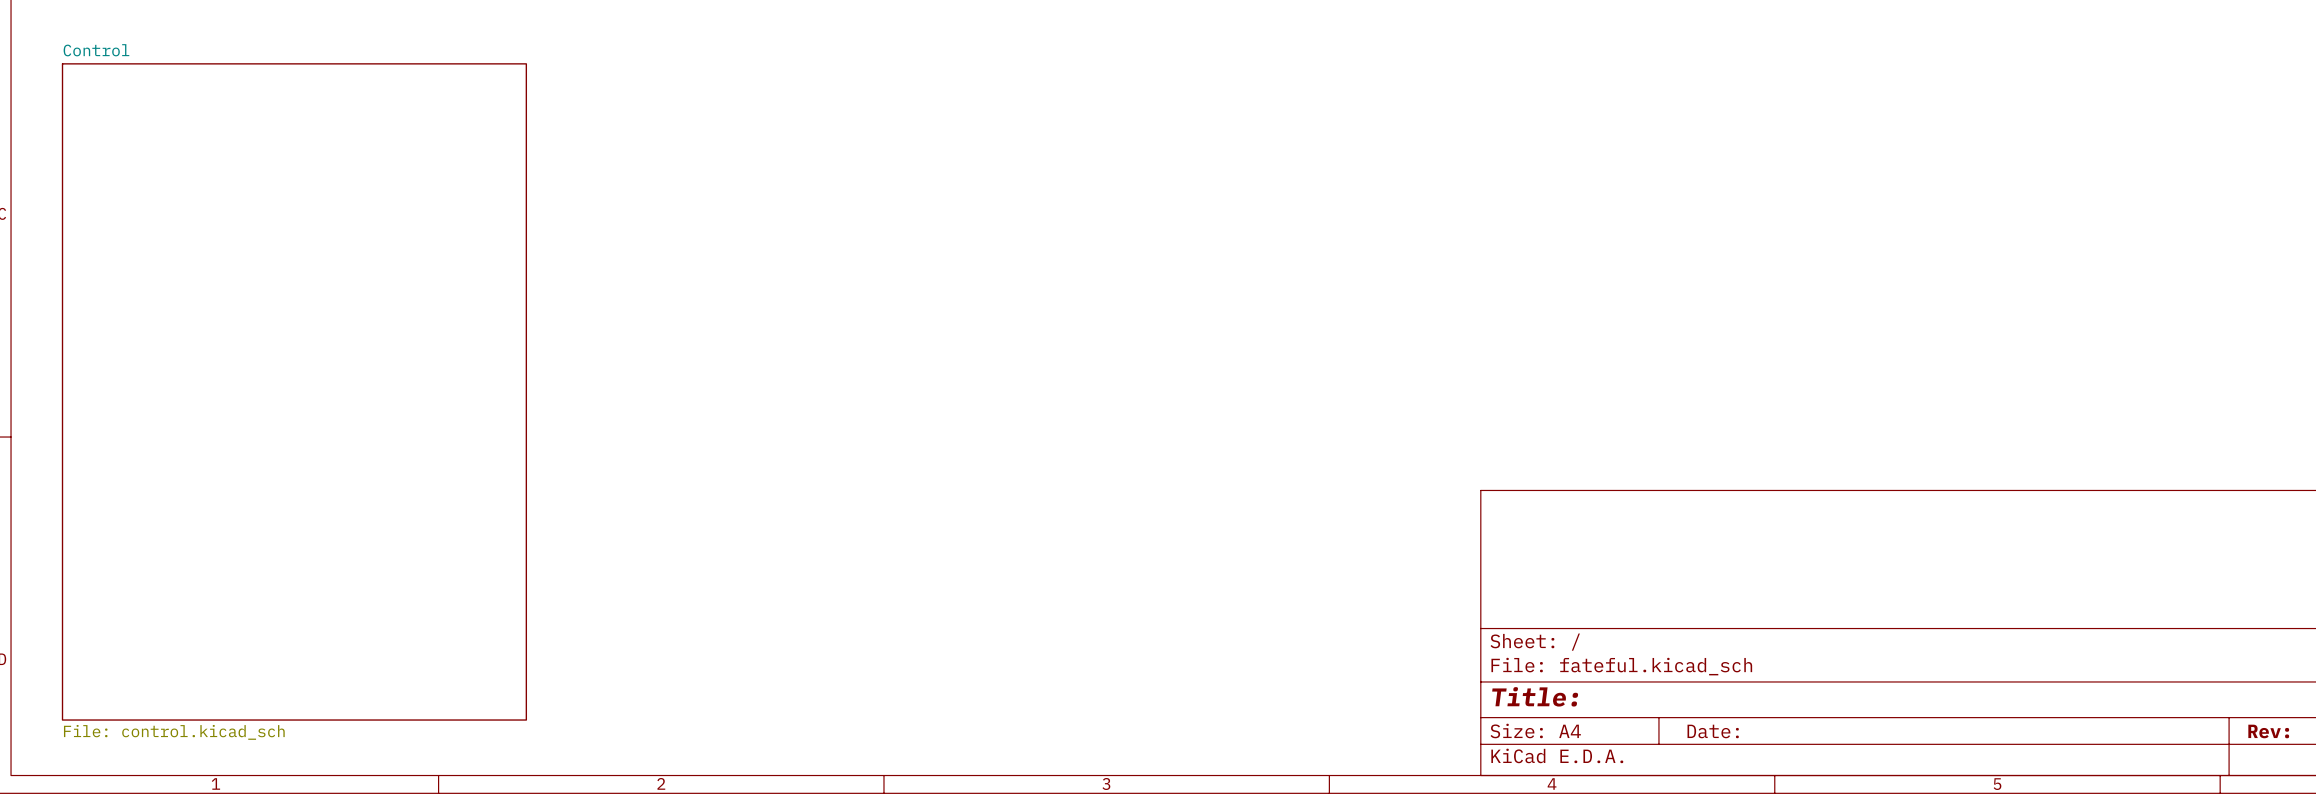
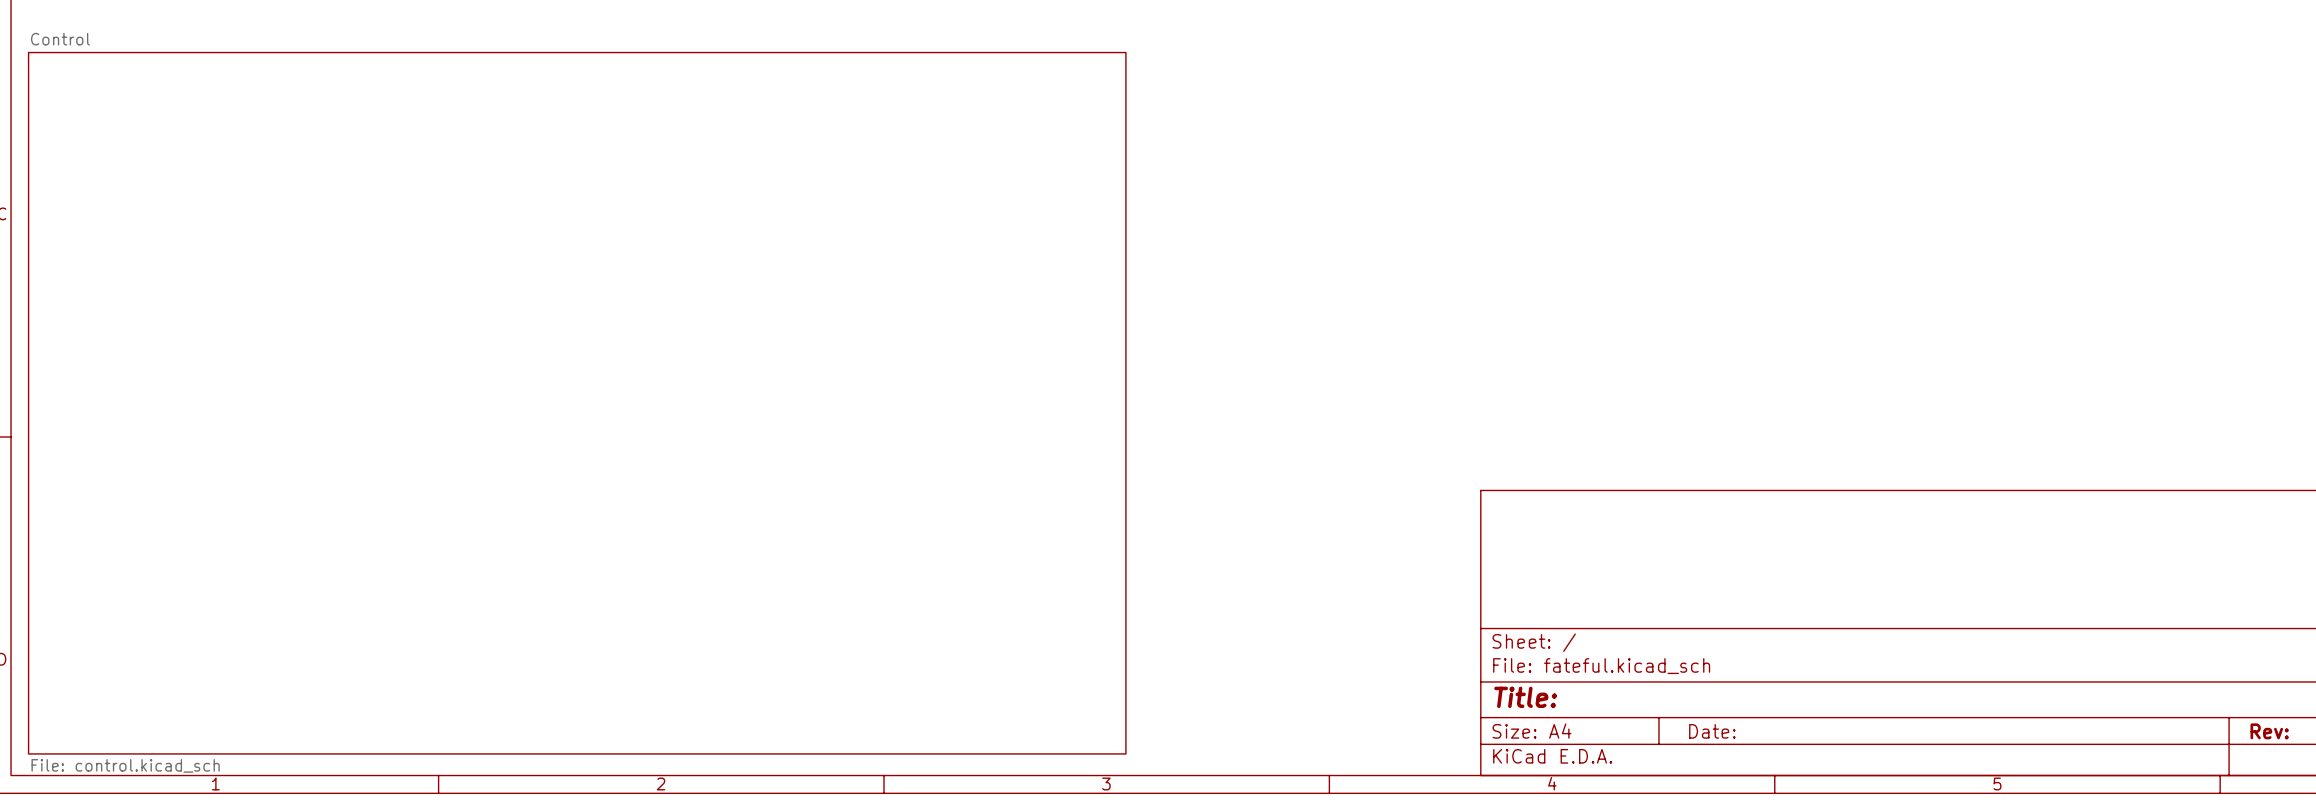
sheet Control: File: control.kicad_sch (294, 391) -> none
sheet Control: none -> File: control.kicad_sch (577, 403)

